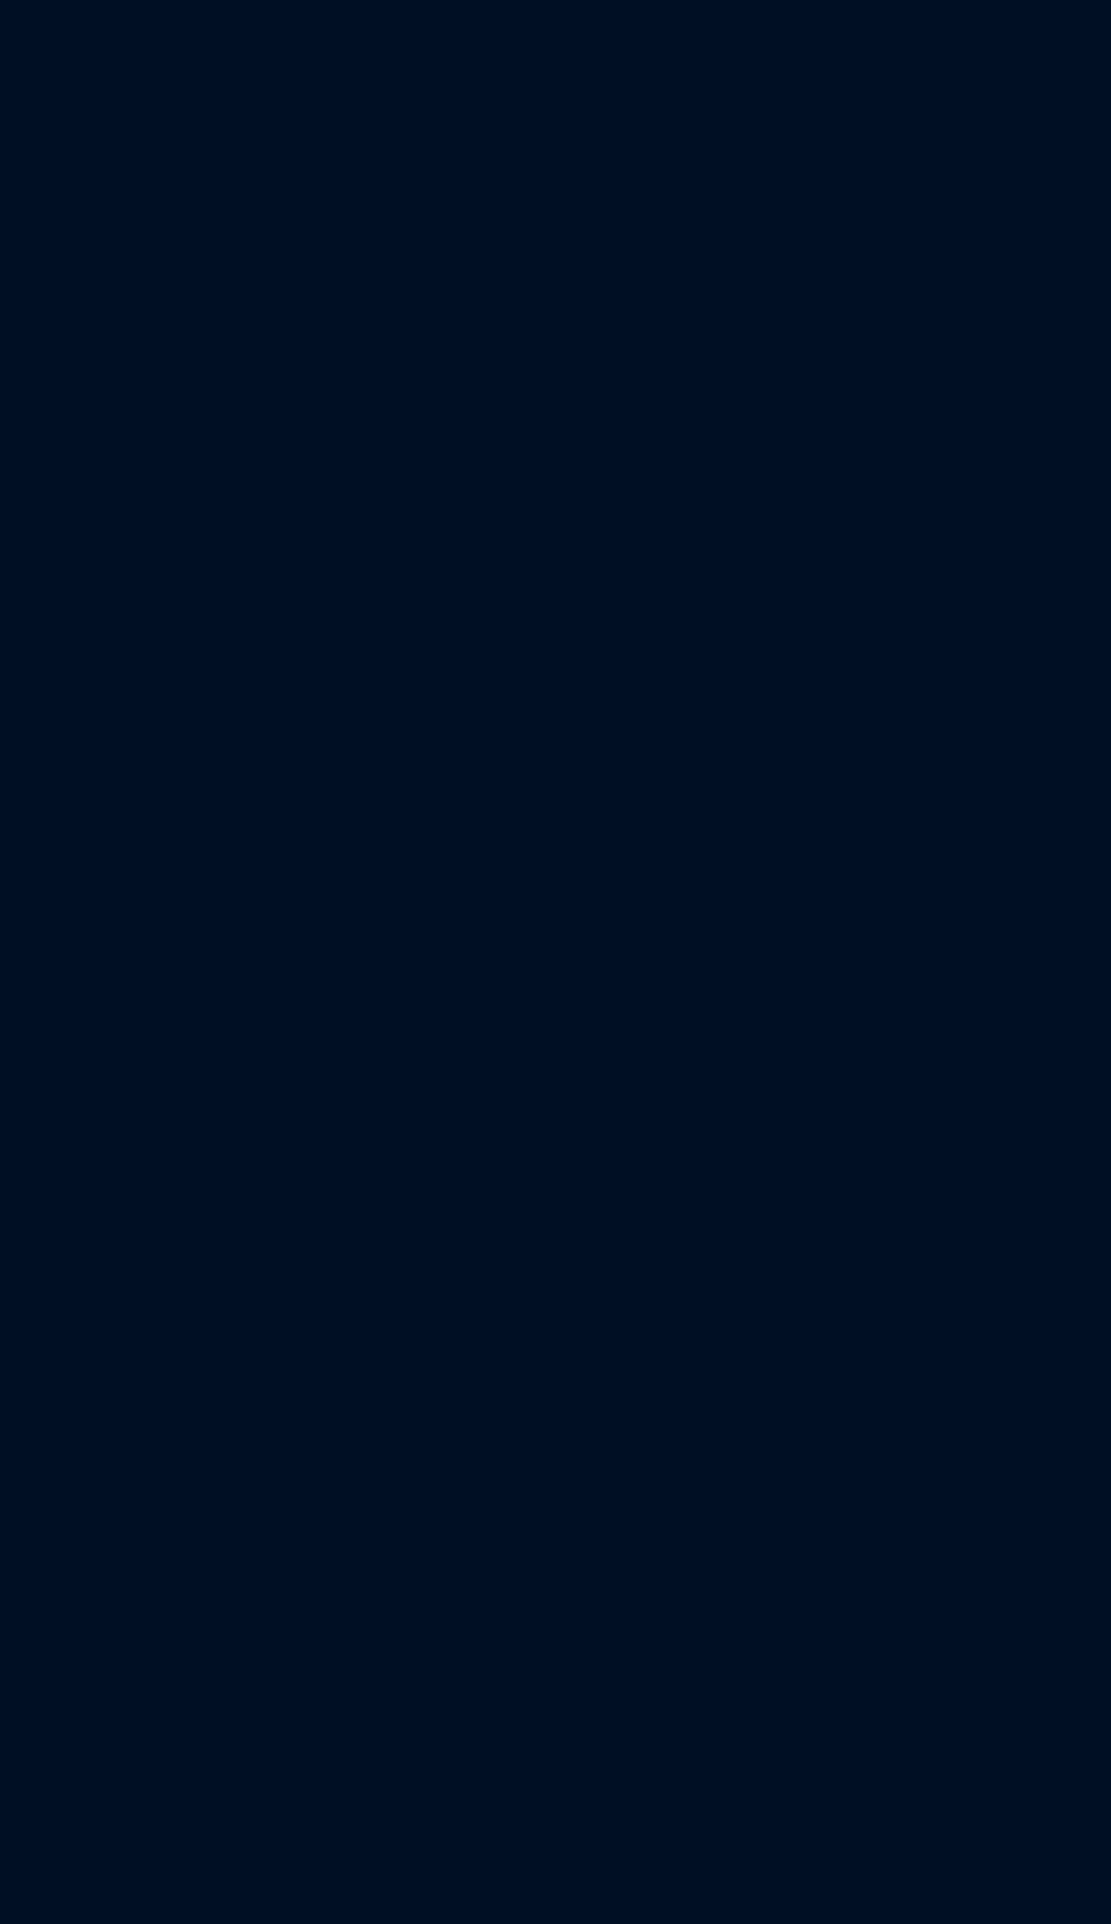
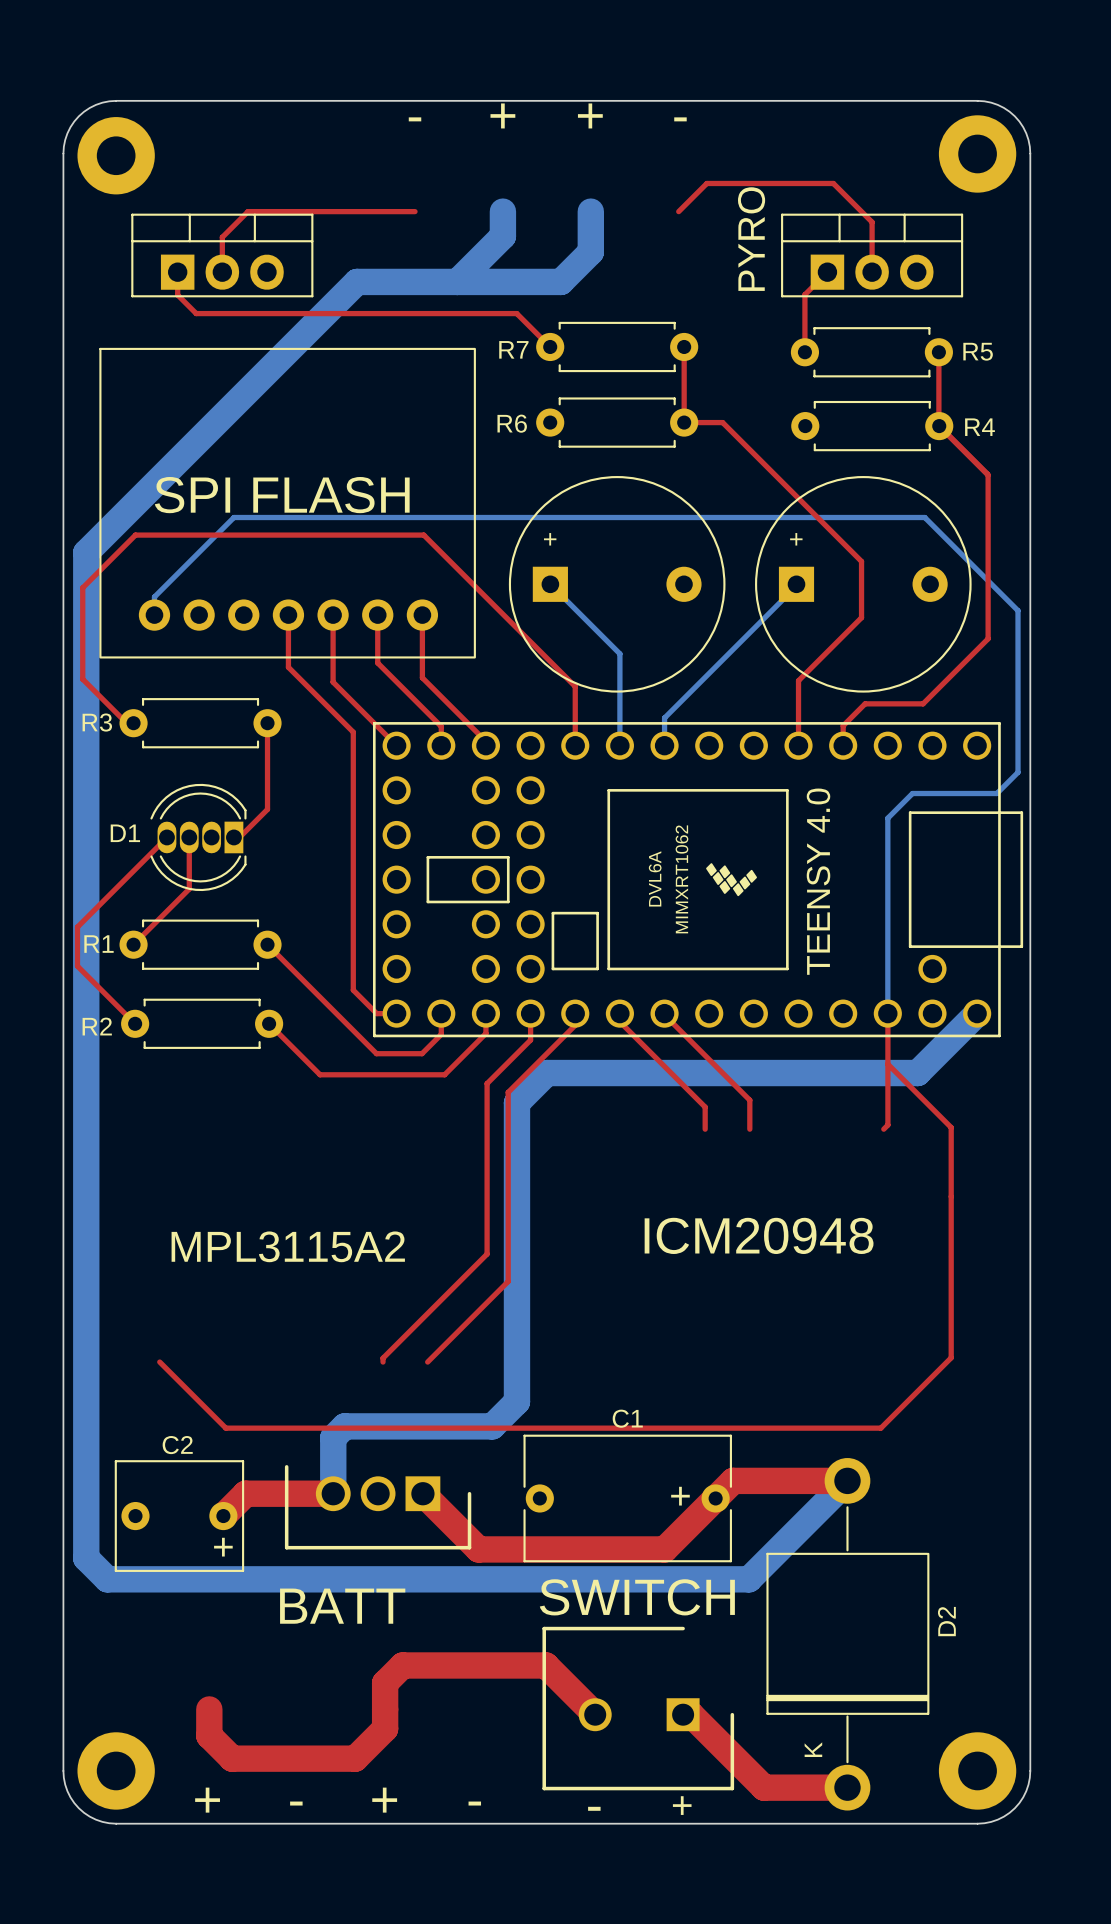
board edge: none -> (116, 100) (977, 100) (991, 102) (1003, 107) (1014, 116) (1023, 127) (1028, 139) (1030, 153) (1030, 1770) (1028, 1784) (1023, 1797) (1014, 1808) (1003, 1816) (991, 1821) (977, 1823) (116, 1823) (102, 1821) (89, 1816) (78, 1808) (70, 1797) (65, 1784) (63, 1770) (63, 153) (67, 133) (78, 116) (95, 104) (116, 100)
text: none -> - (415, 119)
text: none -> + (502, 115)
text: none -> + (590, 115)
text: none -> - (680, 119)
part: none -> (977, 153)
part: none -> (116, 155)
top track: none -> (415, 211) (248, 211) (222, 237) (222, 272)
bottom track: none -> (502, 211) (502, 236) (457, 281)
bottom track: none -> (590, 211) (590, 252) (560, 281) (357, 281) (86, 552) (86, 1558) (107, 1579) (749, 1579) (847, 1480)
top track: none -> (678, 211) (706, 183) (833, 183) (872, 222) (872, 272)
text: none -> PYRO (751, 239)
part: none -> (222, 255)
part: none -> (872, 255)
top track: none -> (177, 272) (177, 295) (196, 313) (516, 313) (550, 346)
top track: none -> (827, 272) (804, 294) (804, 352)
R7: none -> (617, 346)
top track: none -> (684, 346) (684, 422) (722, 422) (861, 561) (861, 617) (798, 680) (798, 745)
R5: none -> (871, 352)
top track: none -> (938, 352) (938, 425) (988, 474) (988, 638) (923, 703) (865, 703) (843, 725) (843, 745)
R6: none -> (617, 422)
R4: none -> (872, 426)
text: none -> SPI FLASH (282, 495)
part: none -> (287, 503)
bottom track: none -> (550, 584) (619, 653) (619, 745)
part: none -> (617, 584)
part: none -> (863, 584)
bottom track: none -> (796, 586) (664, 718) (664, 745)
bottom track: none -> (154, 615) (154, 596) (233, 517) (924, 517) (1018, 610) (1018, 772) (996, 793) (912, 793) (887, 818) (887, 1013)
top track: none -> (288, 615) (288, 667) (353, 732) (353, 990) (376, 1013) (396, 1013)
top track: none -> (333, 615) (333, 682) (396, 745)
top track: none -> (377, 615) (377, 663) (441, 726) (441, 745)
top track: none -> (422, 615) (422, 677) (485, 741) (485, 745)
top track: none -> (133, 723) (126, 723) (82, 679) (82, 587) (135, 535) (423, 535) (575, 686) (575, 745)
R3: none -> (200, 723)
top track: none -> (267, 723) (267, 809) (239, 837)
top track: none -> (166, 837) (77, 927) (77, 966) (135, 1023)
top track: none -> (189, 837) (189, 888) (133, 944)
D1: none -> (198, 837)
part: none -> (698, 879)
text: none -> TEENSY 4.0 (818, 881)
R1: none -> (200, 944)
top track: none -> (267, 944) (376, 1053) (422, 1053) (441, 1034) (441, 1013)
top track: none -> (485, 1013) (485, 1033) (444, 1074) (320, 1074) (269, 1023)
top track: none -> (530, 1013) (530, 1040) (487, 1083) (487, 1254) (383, 1358) (383, 1362)
top track: none -> (575, 1013) (575, 1025) (508, 1092) (508, 1281) (427, 1362)
top track: none -> (619, 1013) (619, 1021) (705, 1107) (705, 1129)
top track: none -> (664, 1013) (749, 1100) (749, 1129)
top track: none -> (887, 1013) (887, 1125) (883, 1129)
bottom track: none -> (977, 1013) (917, 1073) (546, 1073) (516, 1102) (516, 1401) (492, 1426) (344, 1426) (333, 1437) (333, 1493)
R2: none -> (202, 1023)
top track: none -> (887, 1064) (951, 1127) (951, 1357) (880, 1428) (225, 1428) (159, 1362)
text: none -> ICM20948 (759, 1235)
text: none -> MPL3115A2 (288, 1246)
top track: none -> (847, 1480) (733, 1480) (664, 1549) (478, 1549) (422, 1493)
top track: none -> (333, 1493) (245, 1493) (223, 1516)
C1: none -> (627, 1498)
text: none -> + (680, 1496)
part: none -> (378, 1507)
C2: none -> (179, 1516)
text: none -> + (223, 1547)
text: none -> SWITCH (637, 1597)
text: none -> BATT (342, 1606)
D2: none -> (847, 1634)
part: none -> (638, 1708)
top track: none -> (209, 1709) (209, 1735) (232, 1758) (355, 1758) (385, 1728) (385, 1683) (402, 1665) (545, 1665) (595, 1714)
top track: none -> (683, 1714) (691, 1714) (763, 1787) (847, 1787)
part: none -> (116, 1770)
part: none -> (977, 1770)
text: none -> + (207, 1800)
text: none -> - (296, 1803)
text: none -> + (384, 1800)
text: none -> - (474, 1803)
text: none -> - (594, 1808)
text: none -> + (682, 1805)

